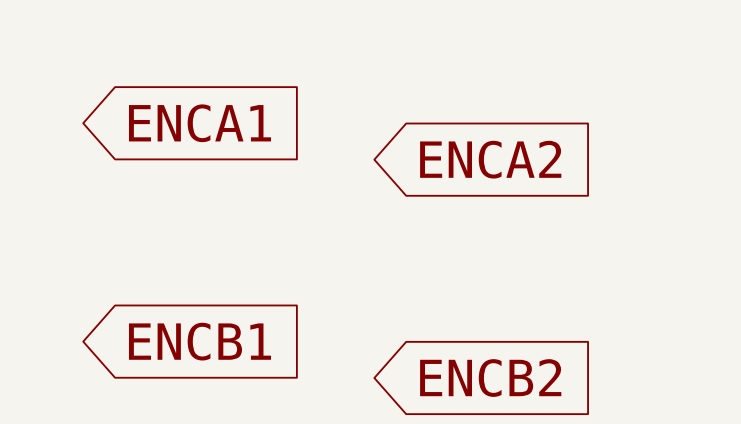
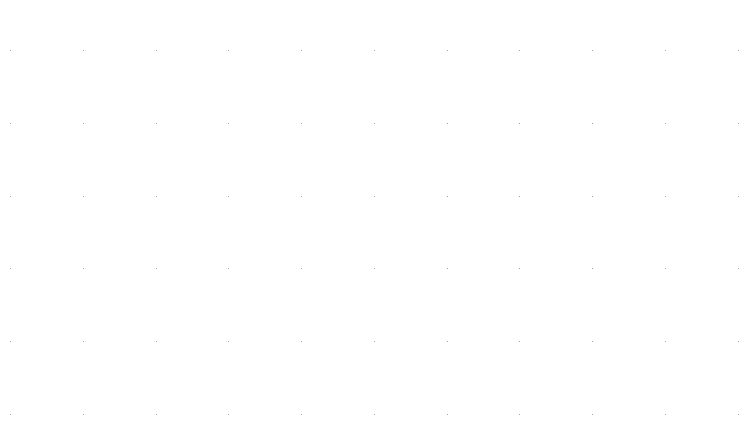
global label: ENCA1 (200, 123) -> none
global label: ENCA2 (490, 159) -> none
global label: ENCB1 (200, 341) -> none
global label: ENCB2 (490, 378) -> none

